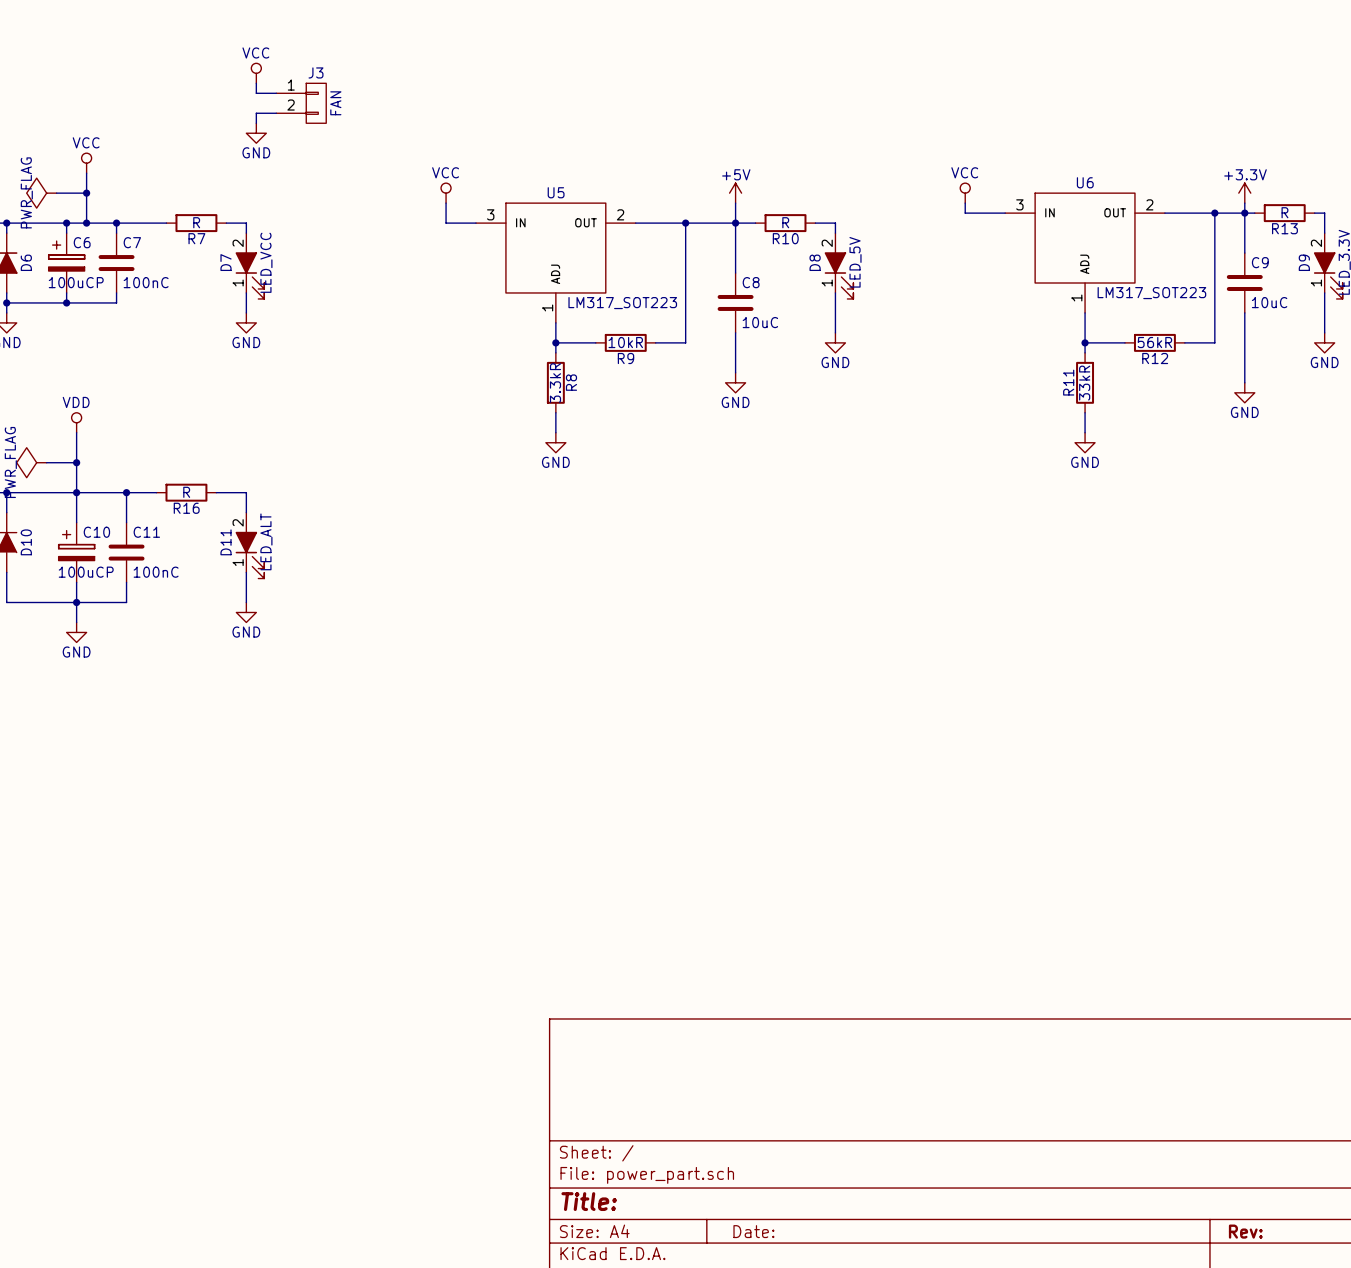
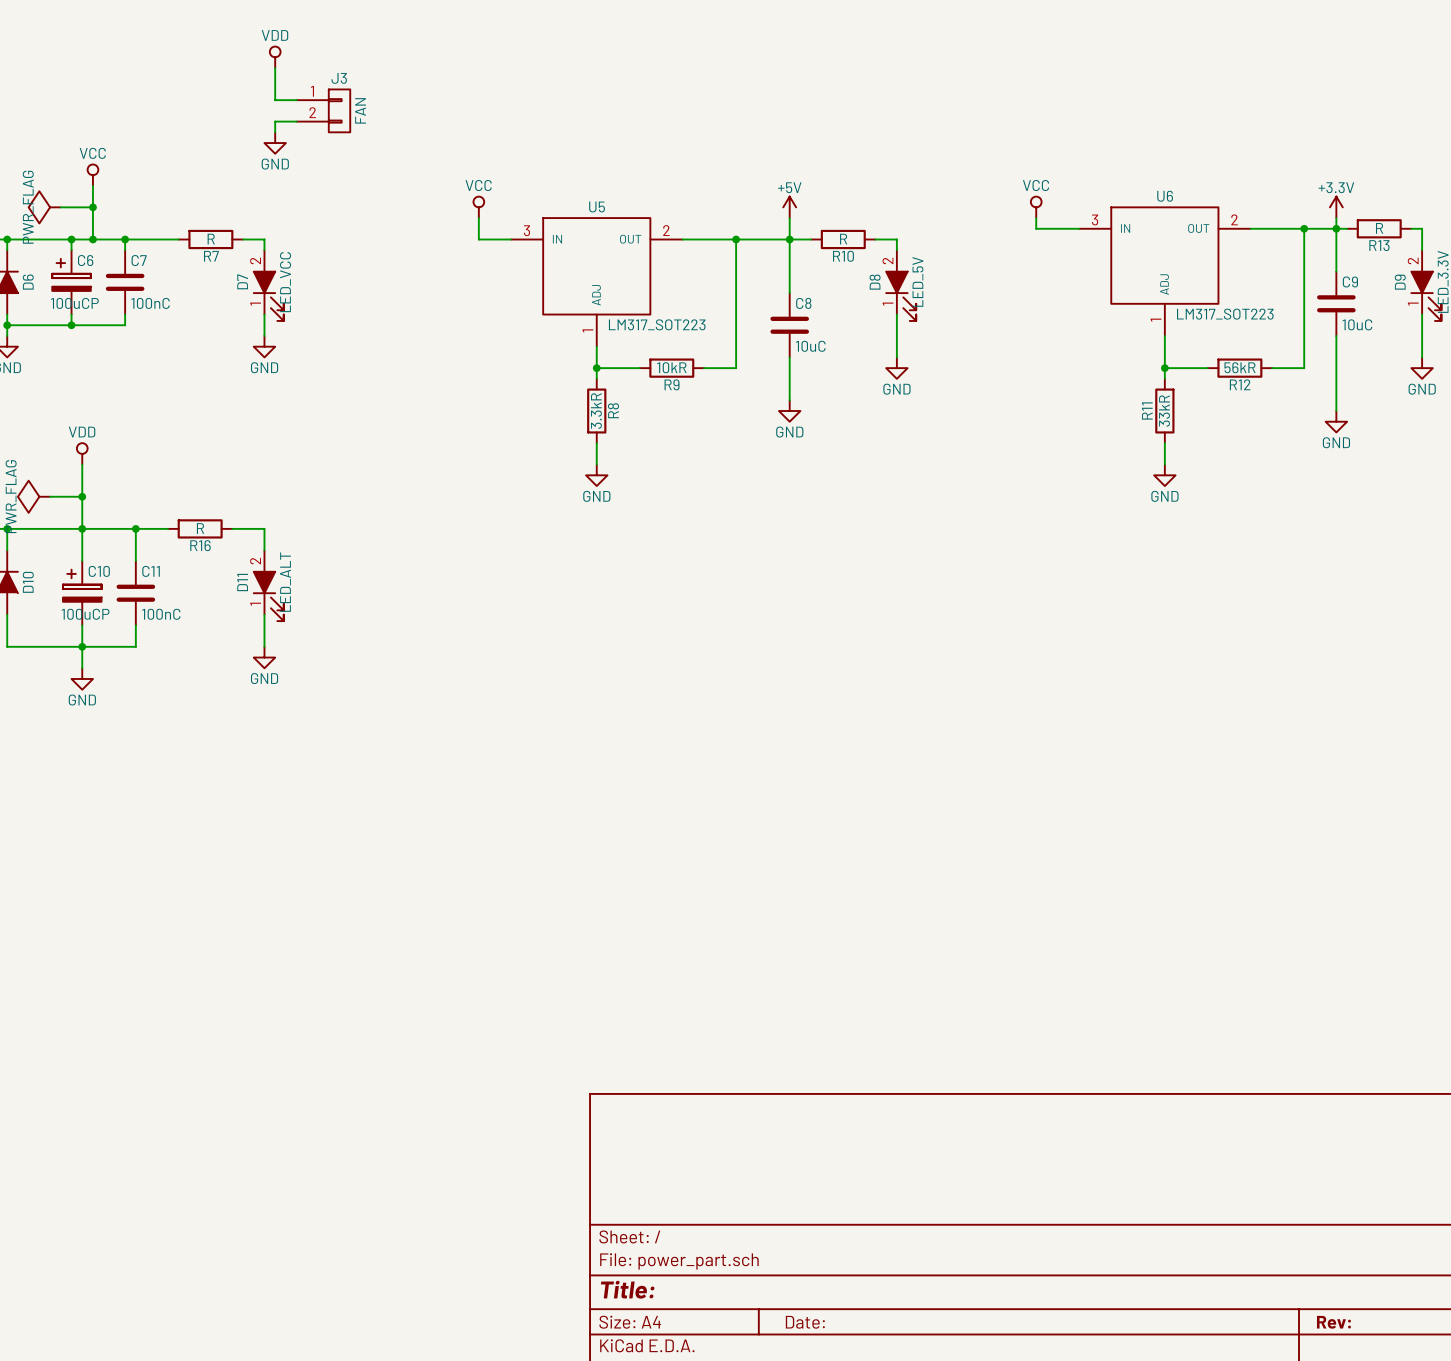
power symbol: none -> VDD (275, 57)
power symbol: VCC (256, 73) -> none

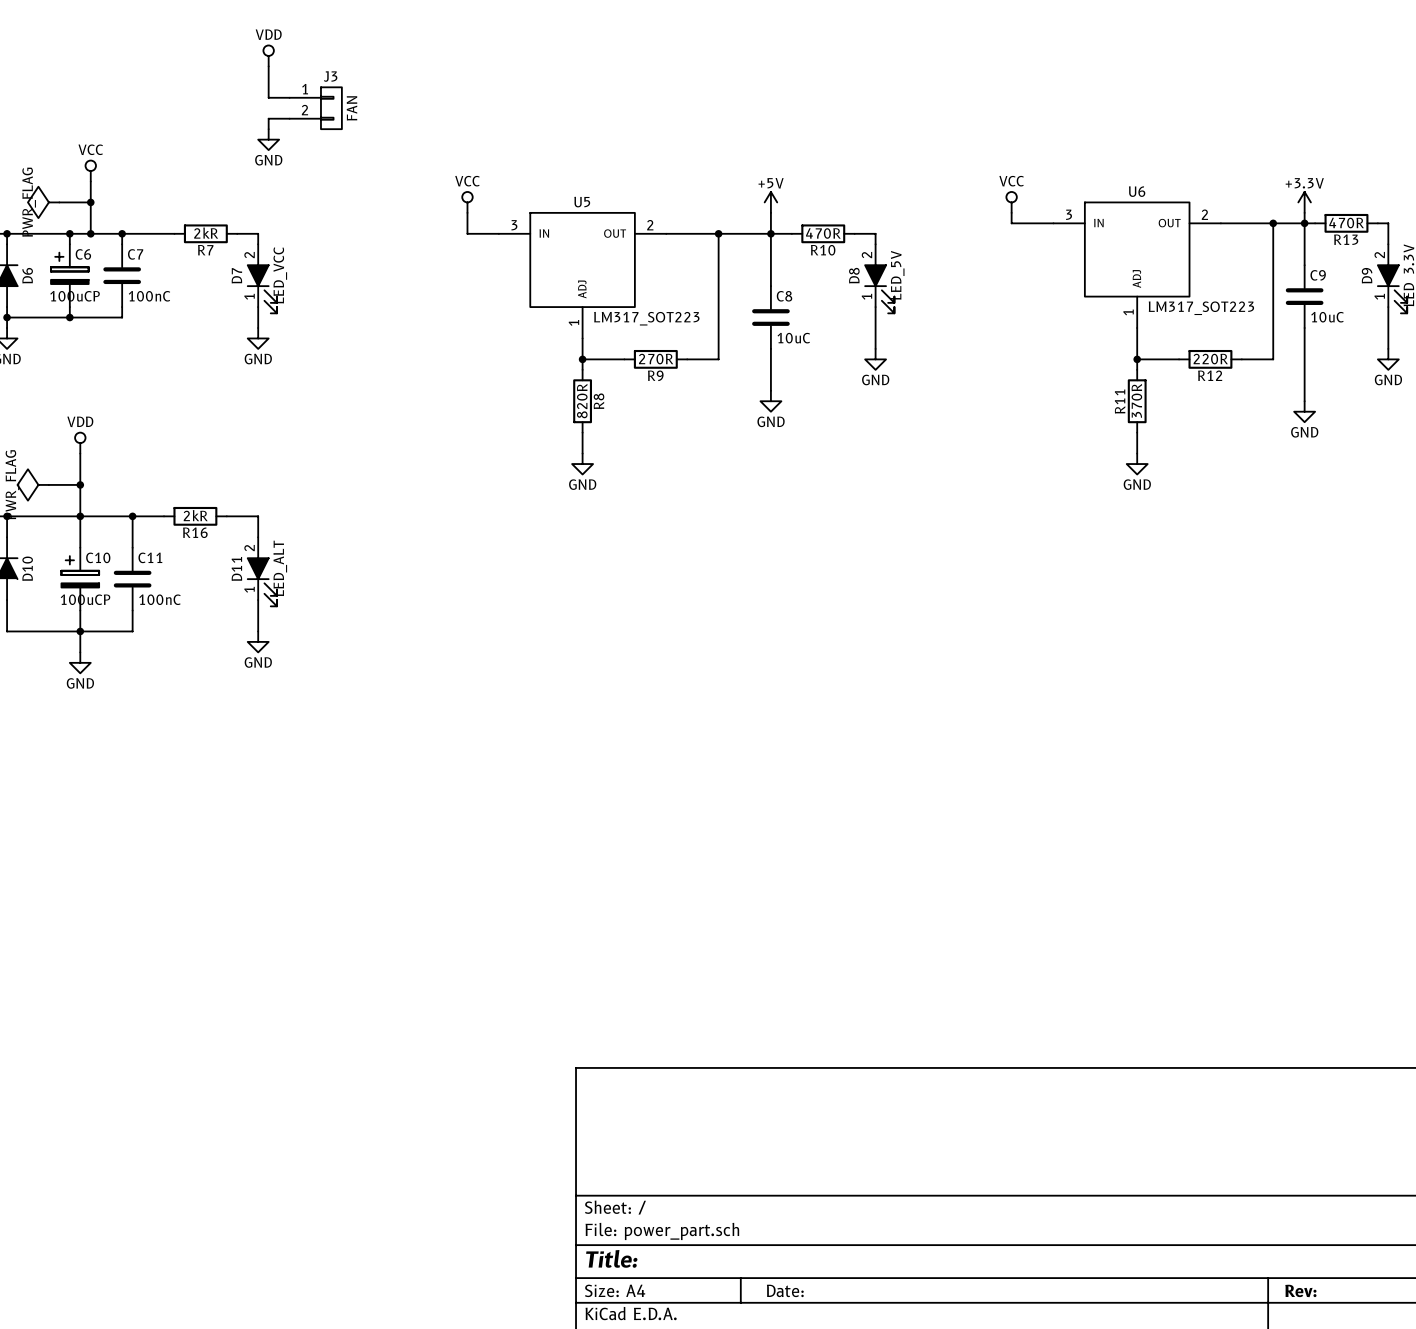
R13 value: R (1379, 228) -> 470R (1346, 223)
R7 value: R (211, 239) -> 2kR (206, 233)
R10 value: R (843, 239) -> 470R (823, 233)
R9 value: 10kR (671, 367) -> 270R (656, 359)
R12 value: 56kR (1240, 367) -> 220R (1210, 359)
R8 value: 3.3kR (596, 411) -> 820R (582, 401)
R11 value: 33kR (1164, 411) -> 370R (1136, 400)
R16 value: R (200, 528) -> 2kR (195, 515)

